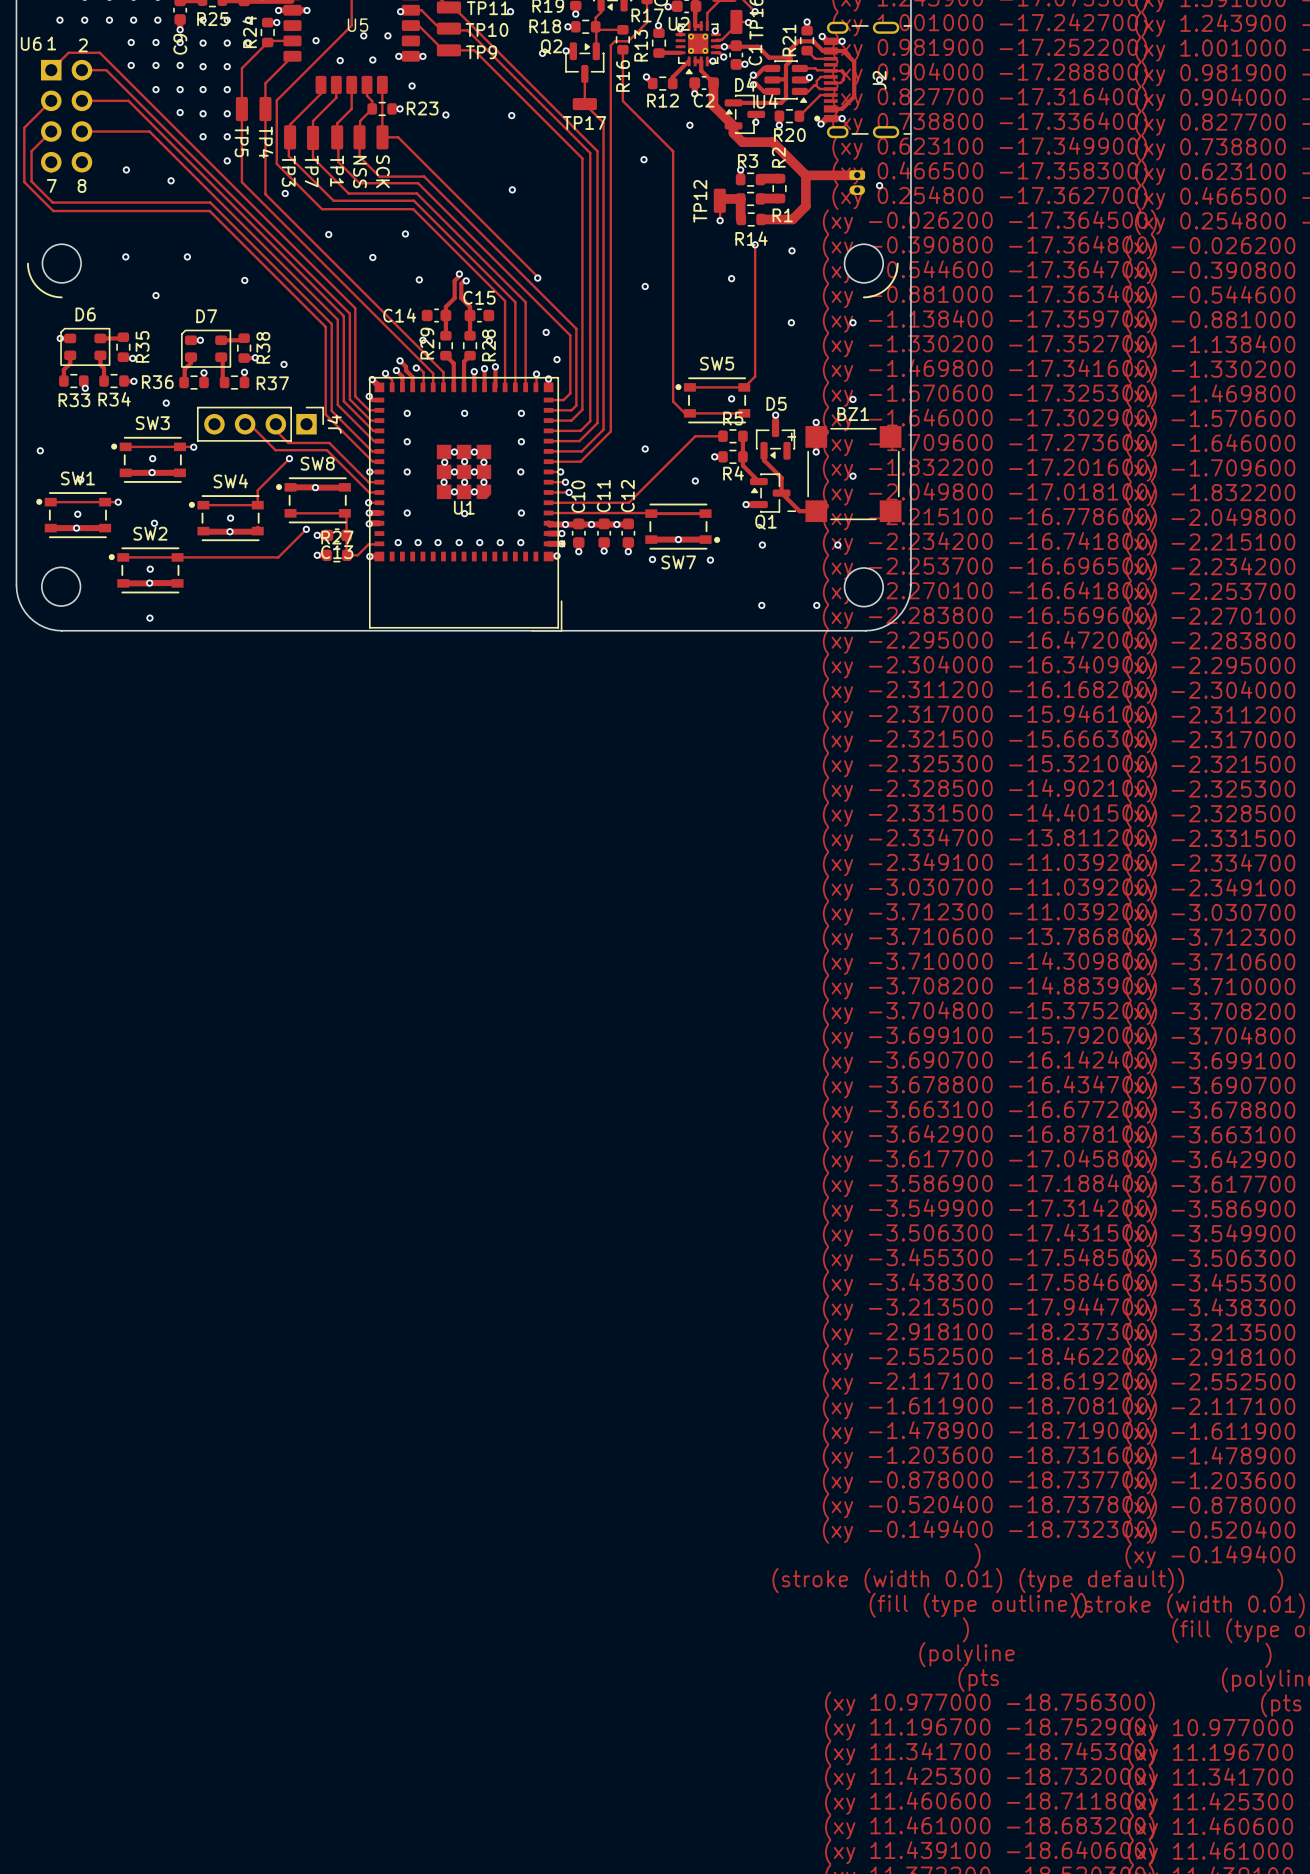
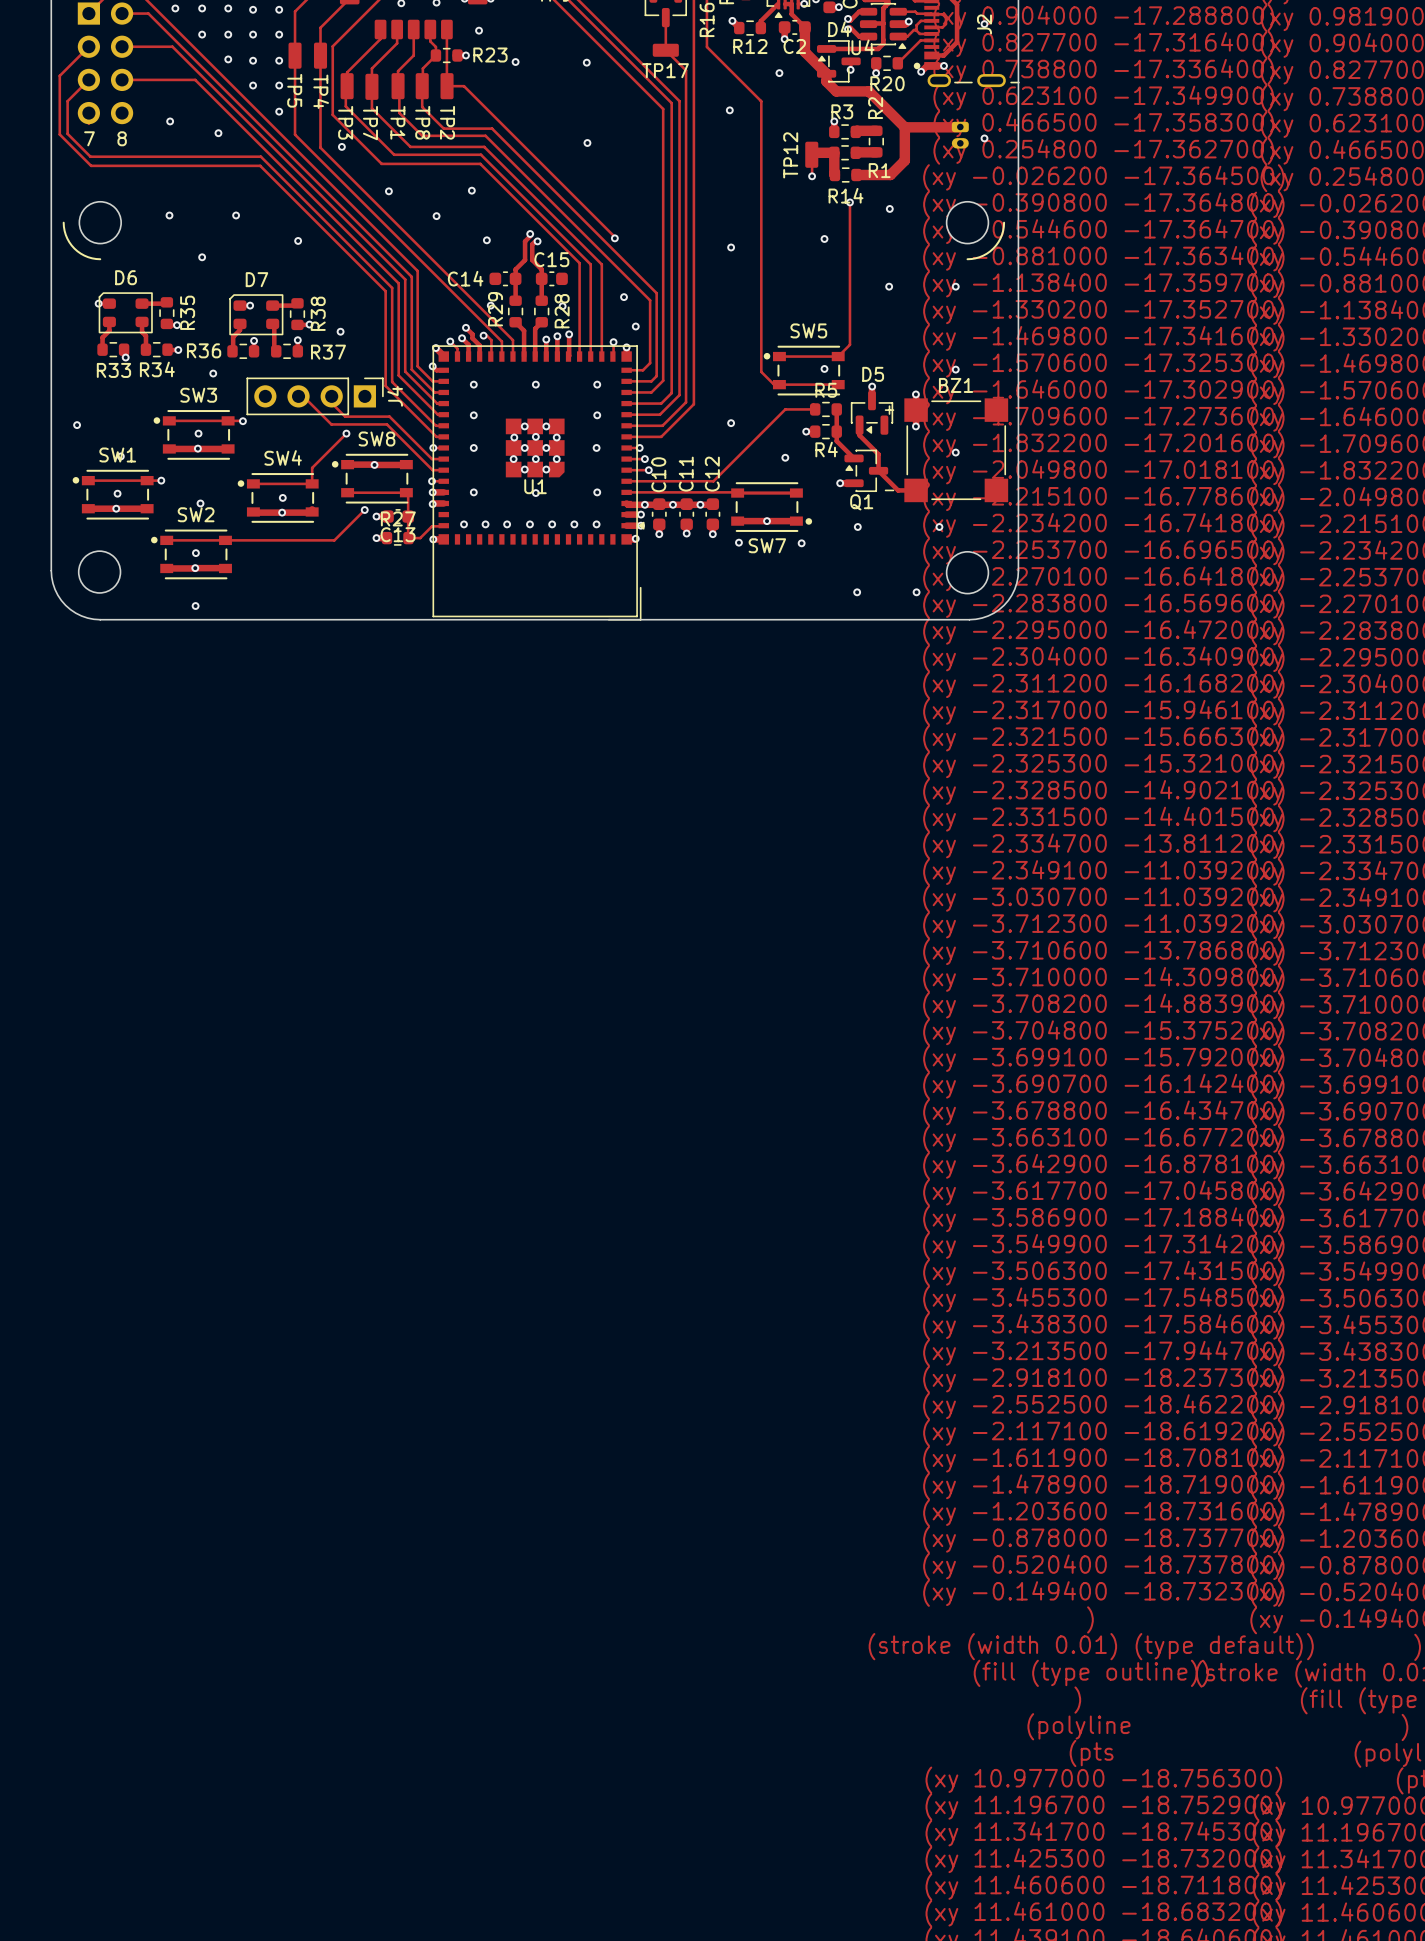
SCK name: SCK (382, 171) -> TP2 (447, 122)
NSS name: NSS (359, 172) -> TP8 (422, 122)

